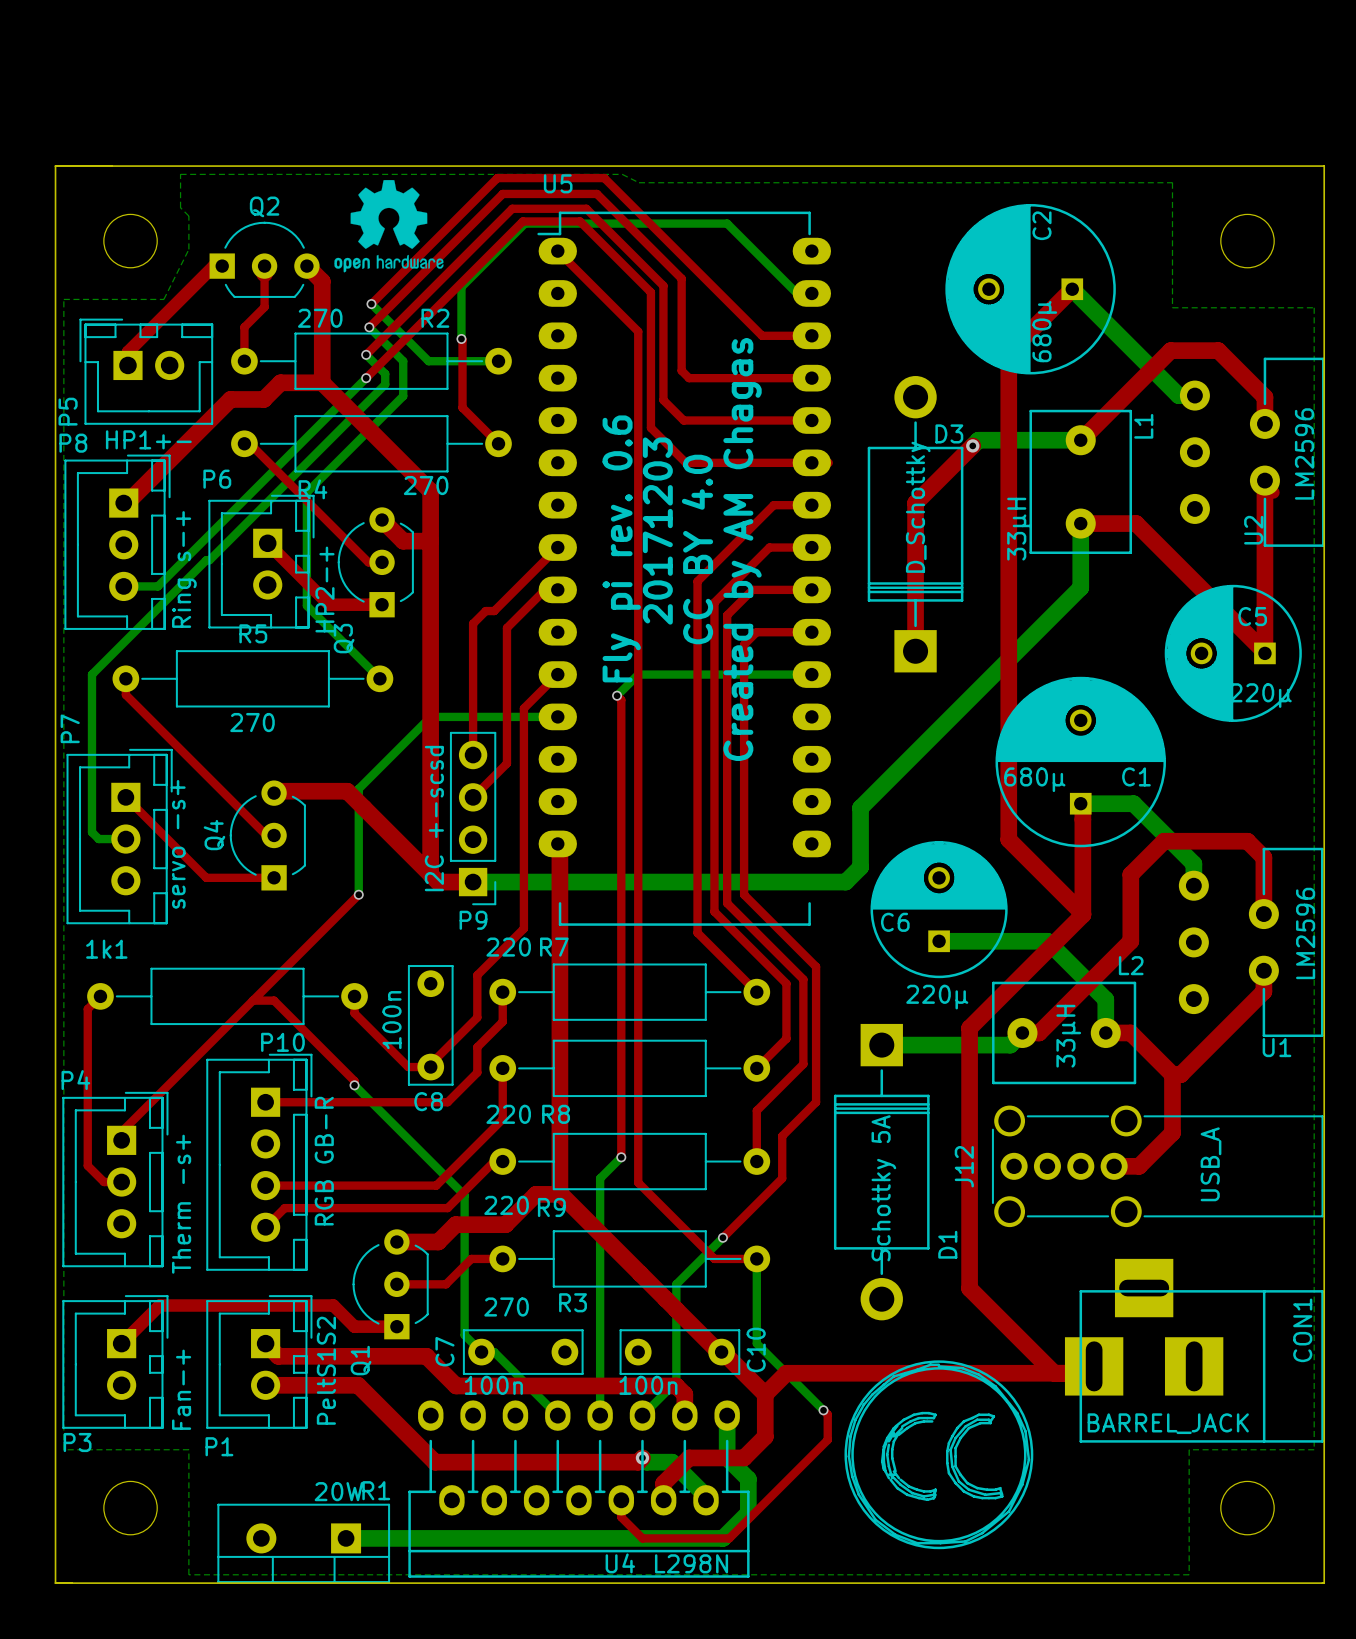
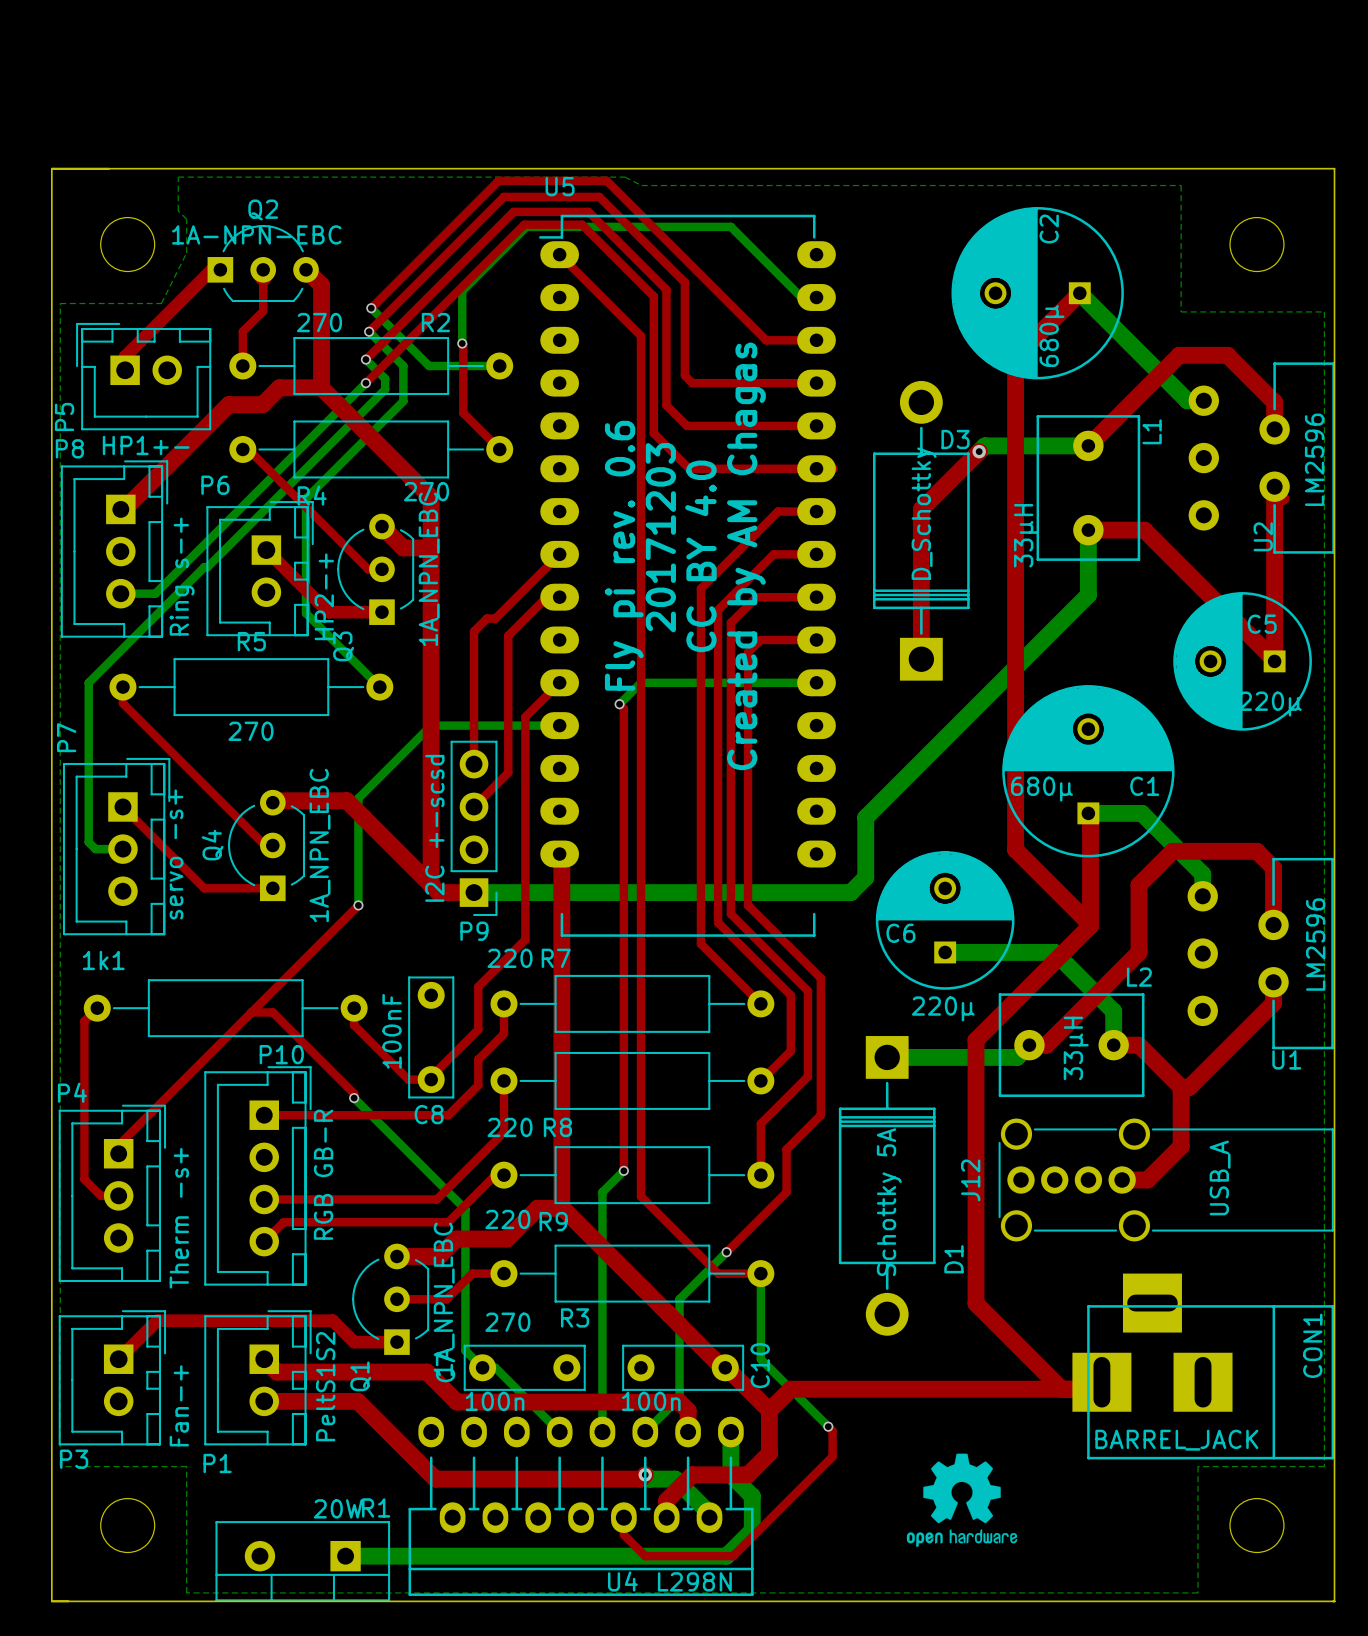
drawing: [334, 180, 444, 273] -> none
Q2 value: none -> 1A-NPN-EBC (256, 234)
Q3 value: none -> 1A_NPN_EBC (429, 569)
Q4 value: none -> 1A_NPN_EBC (320, 845)
C8 value: 100n (392, 1020) -> 100nF (392, 1031)
Q1 value: none -> 1A_NPN_EBC (444, 1299)
drawing: [844, 1360, 1034, 1550] -> none
drawing: none -> [906, 1453, 1018, 1548]

